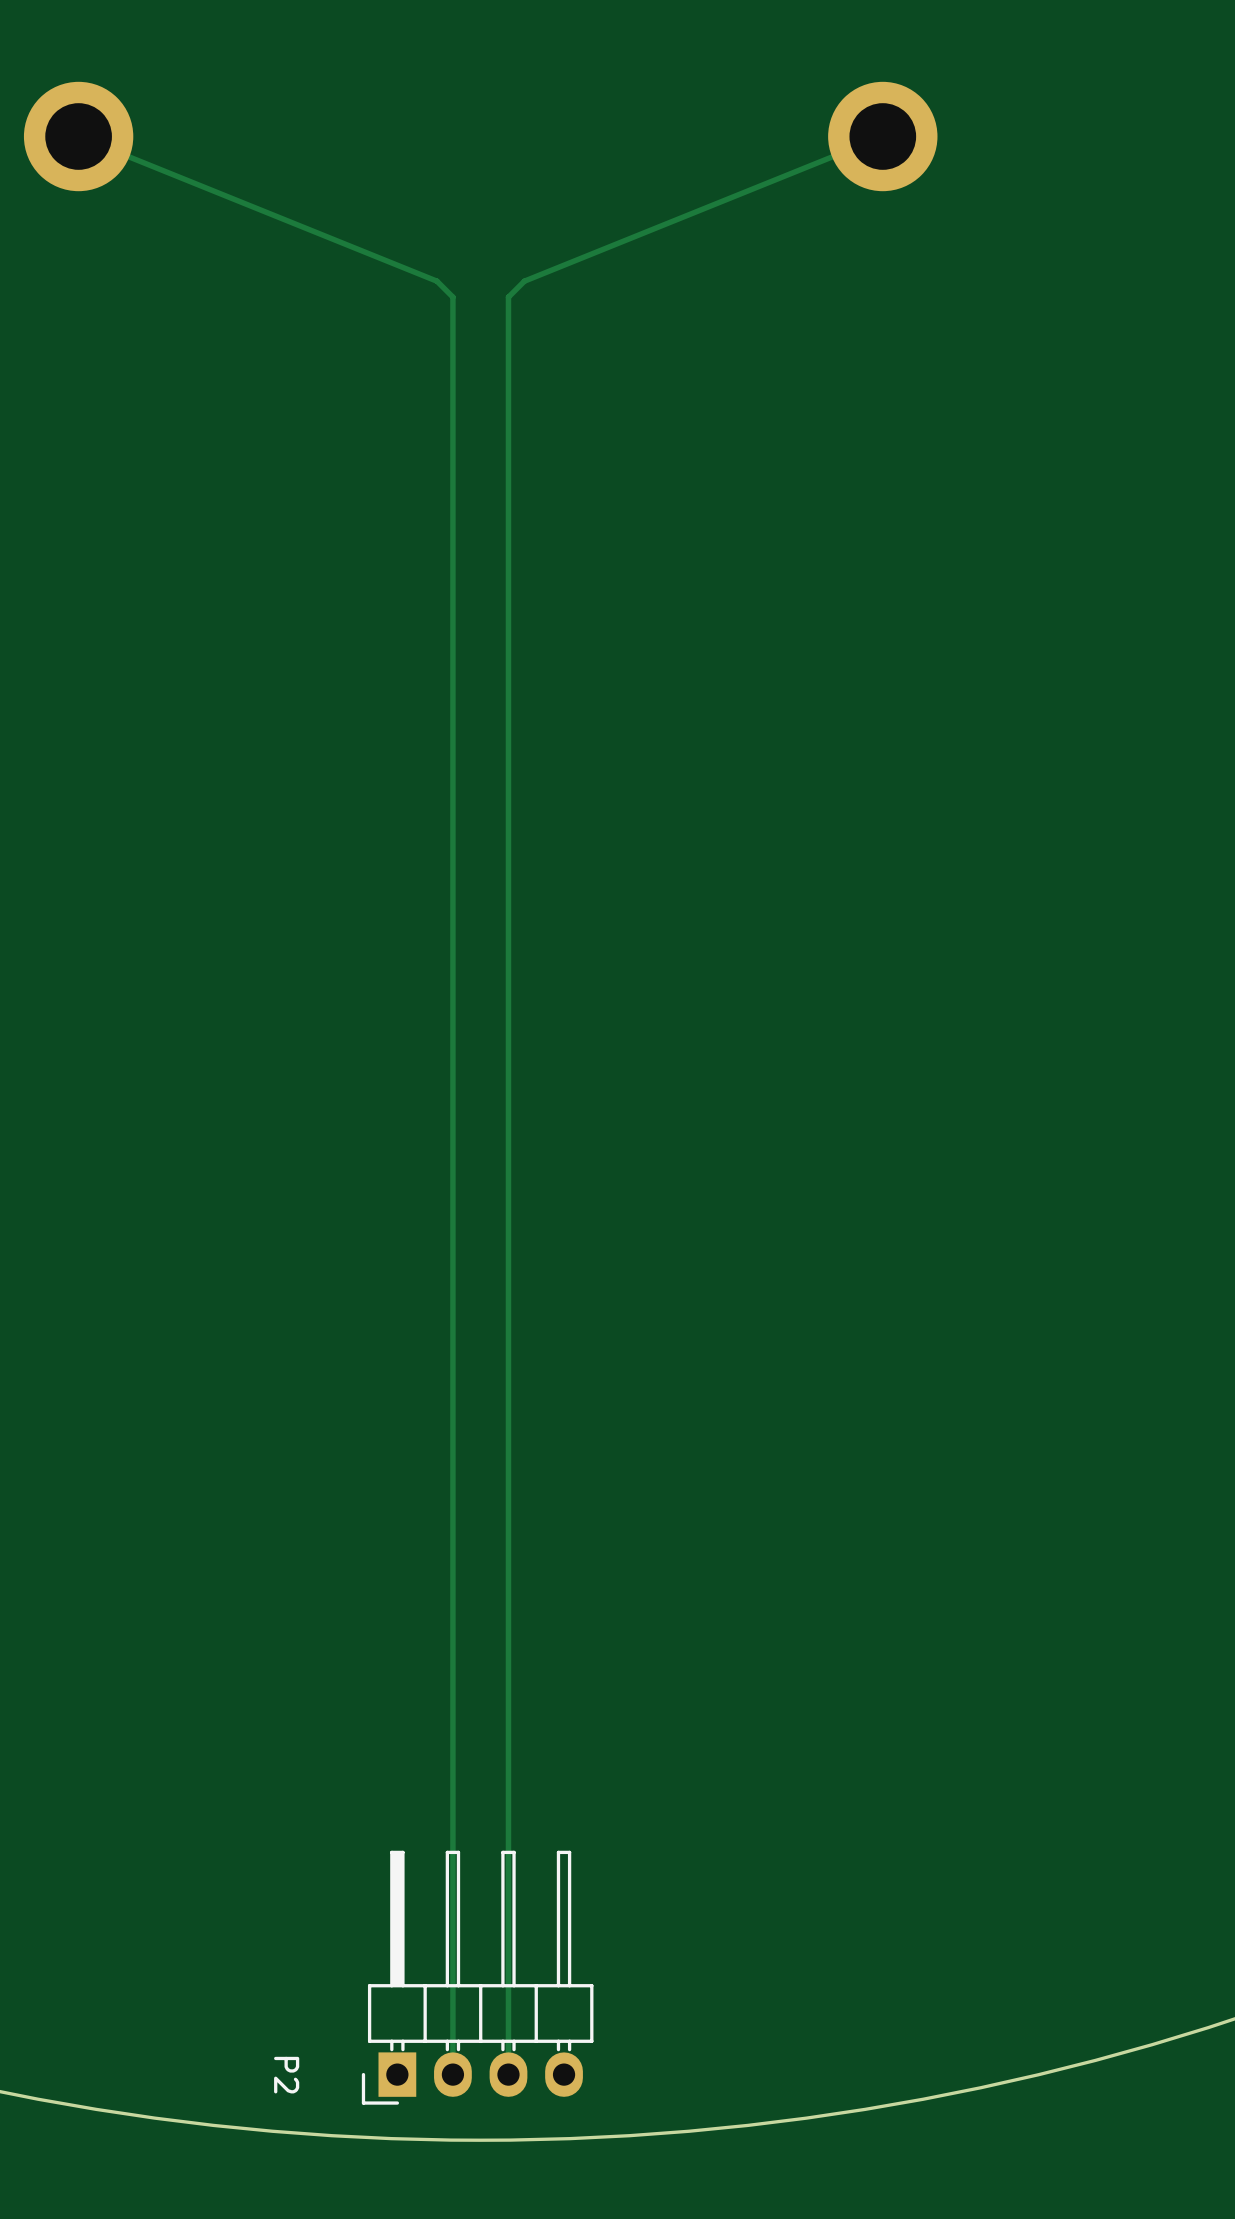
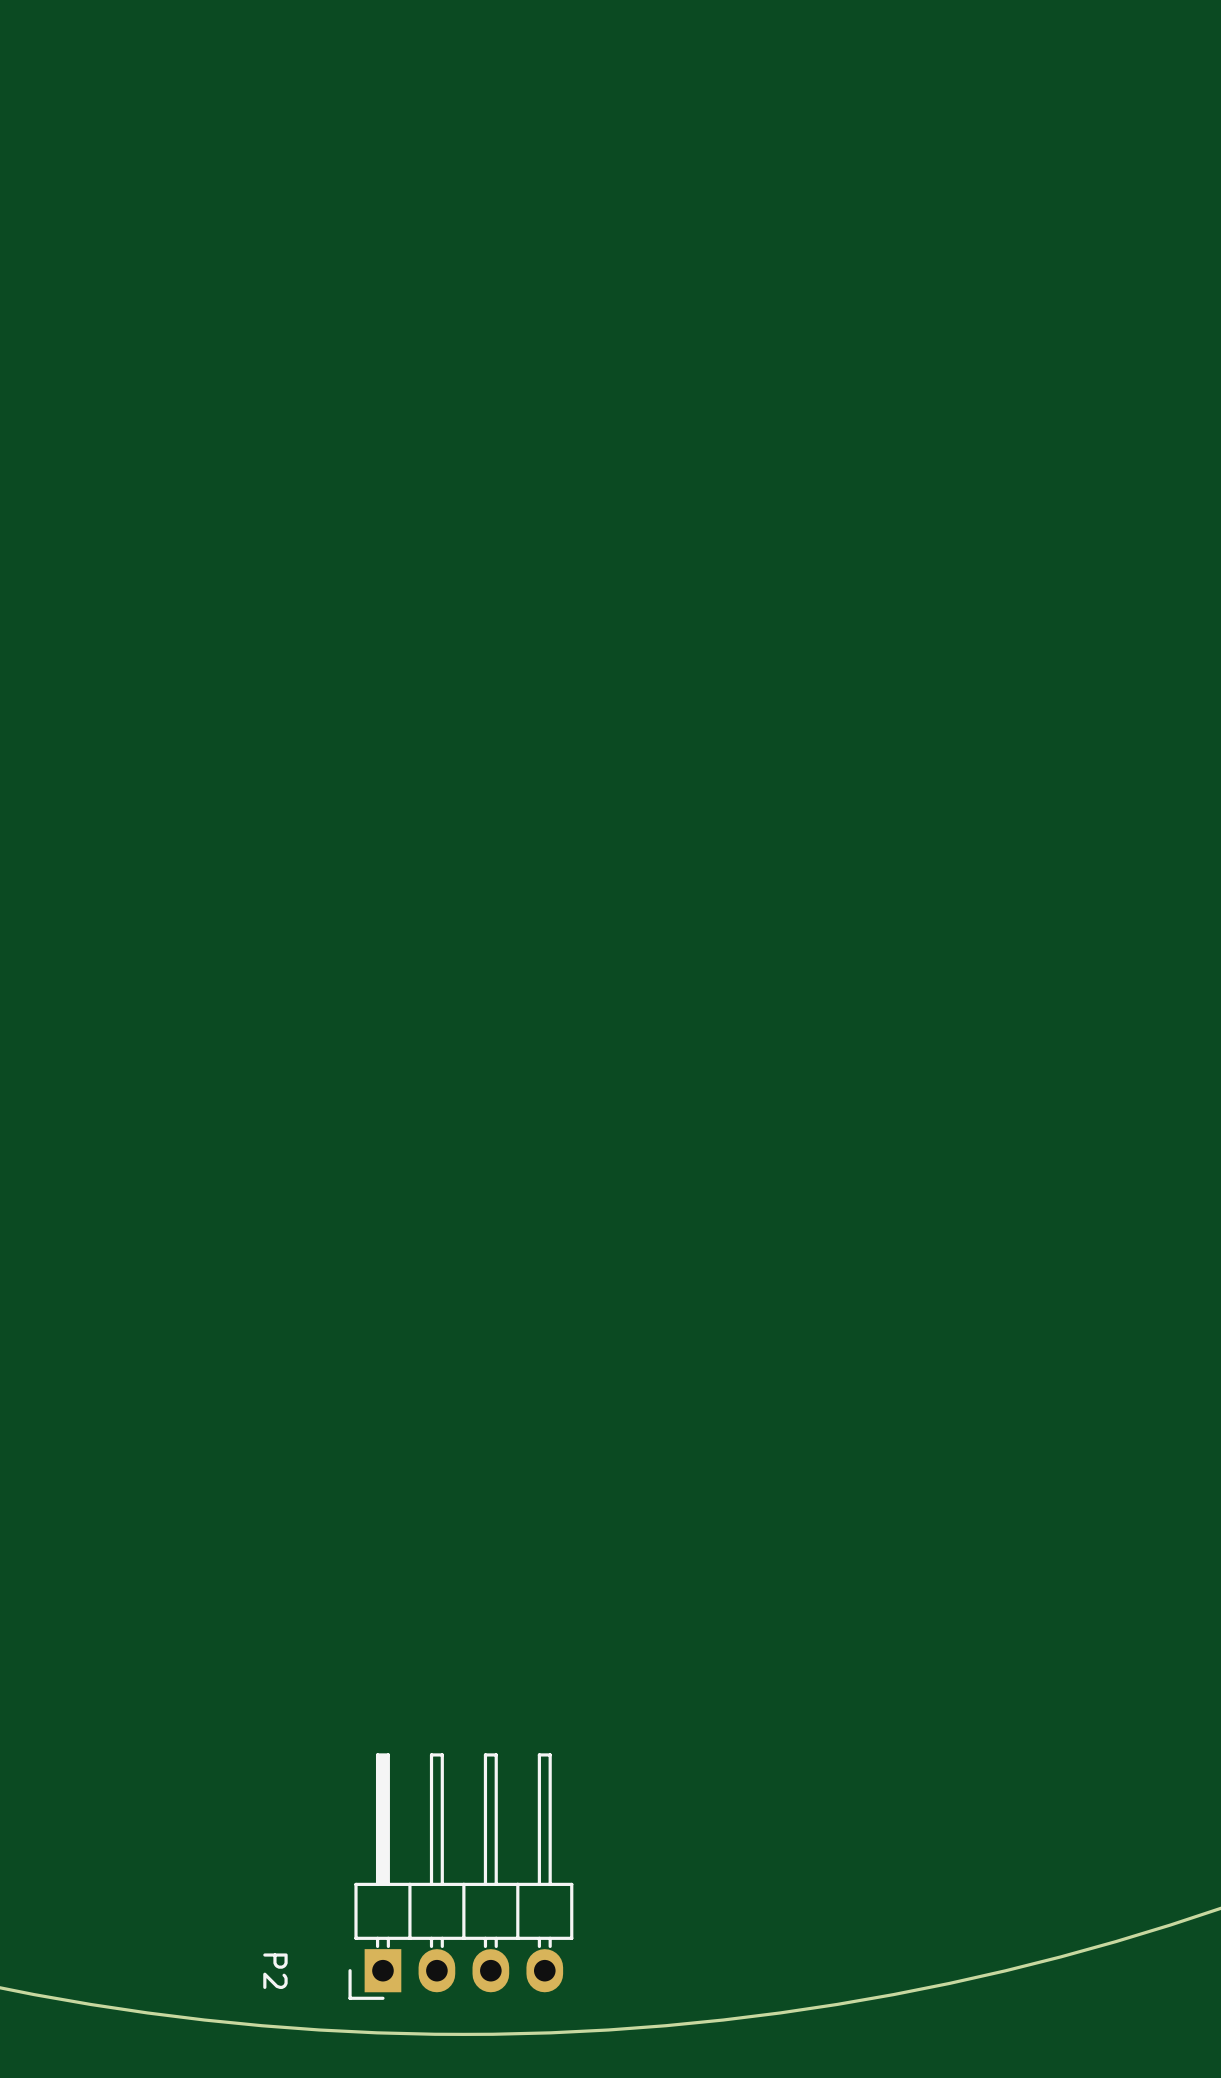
track: (78, 136) (436, 281) (452, 297) (452, 2064) -> none
part: (78, 136) -> none
track: (882, 136) (524, 281) (508, 297) (508, 2074) -> none
part: (882, 136) -> none

